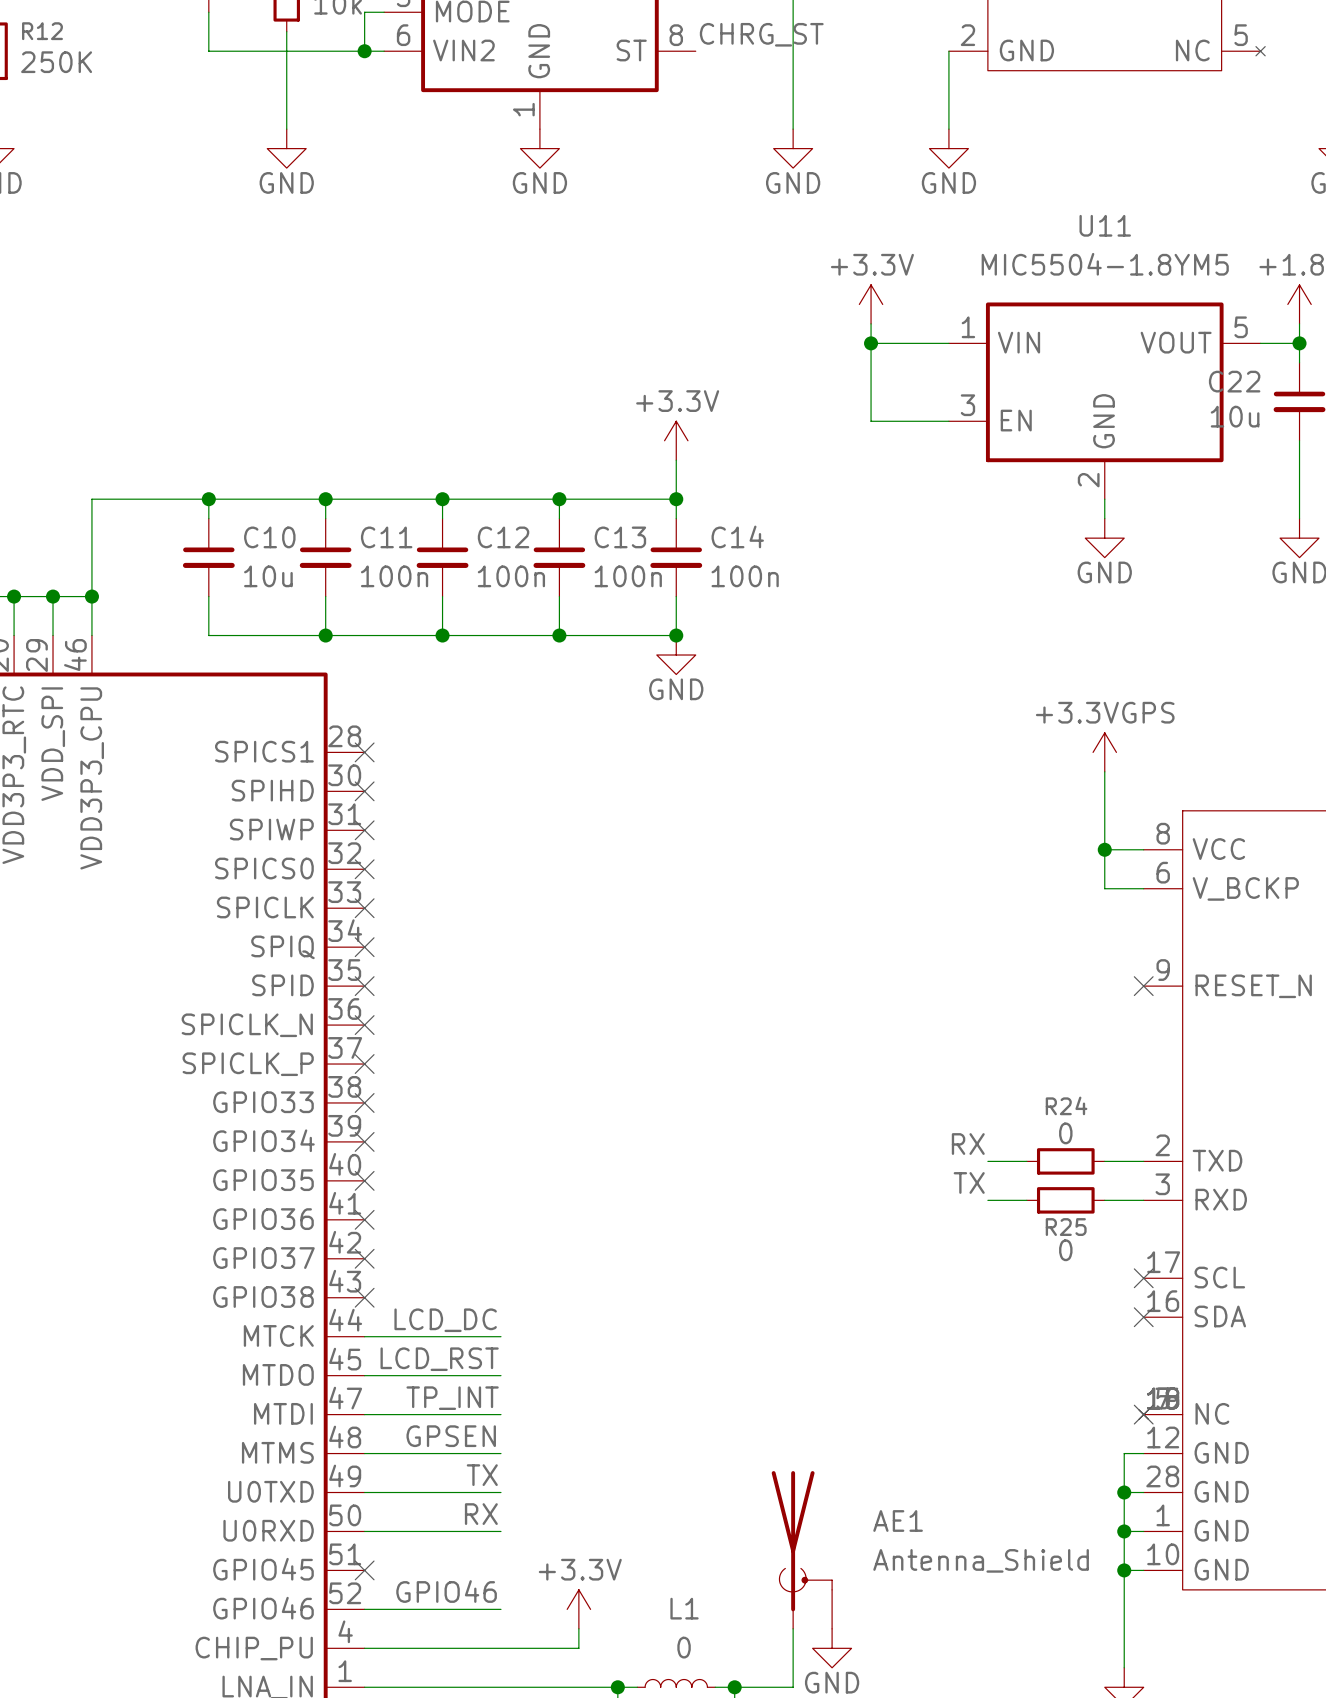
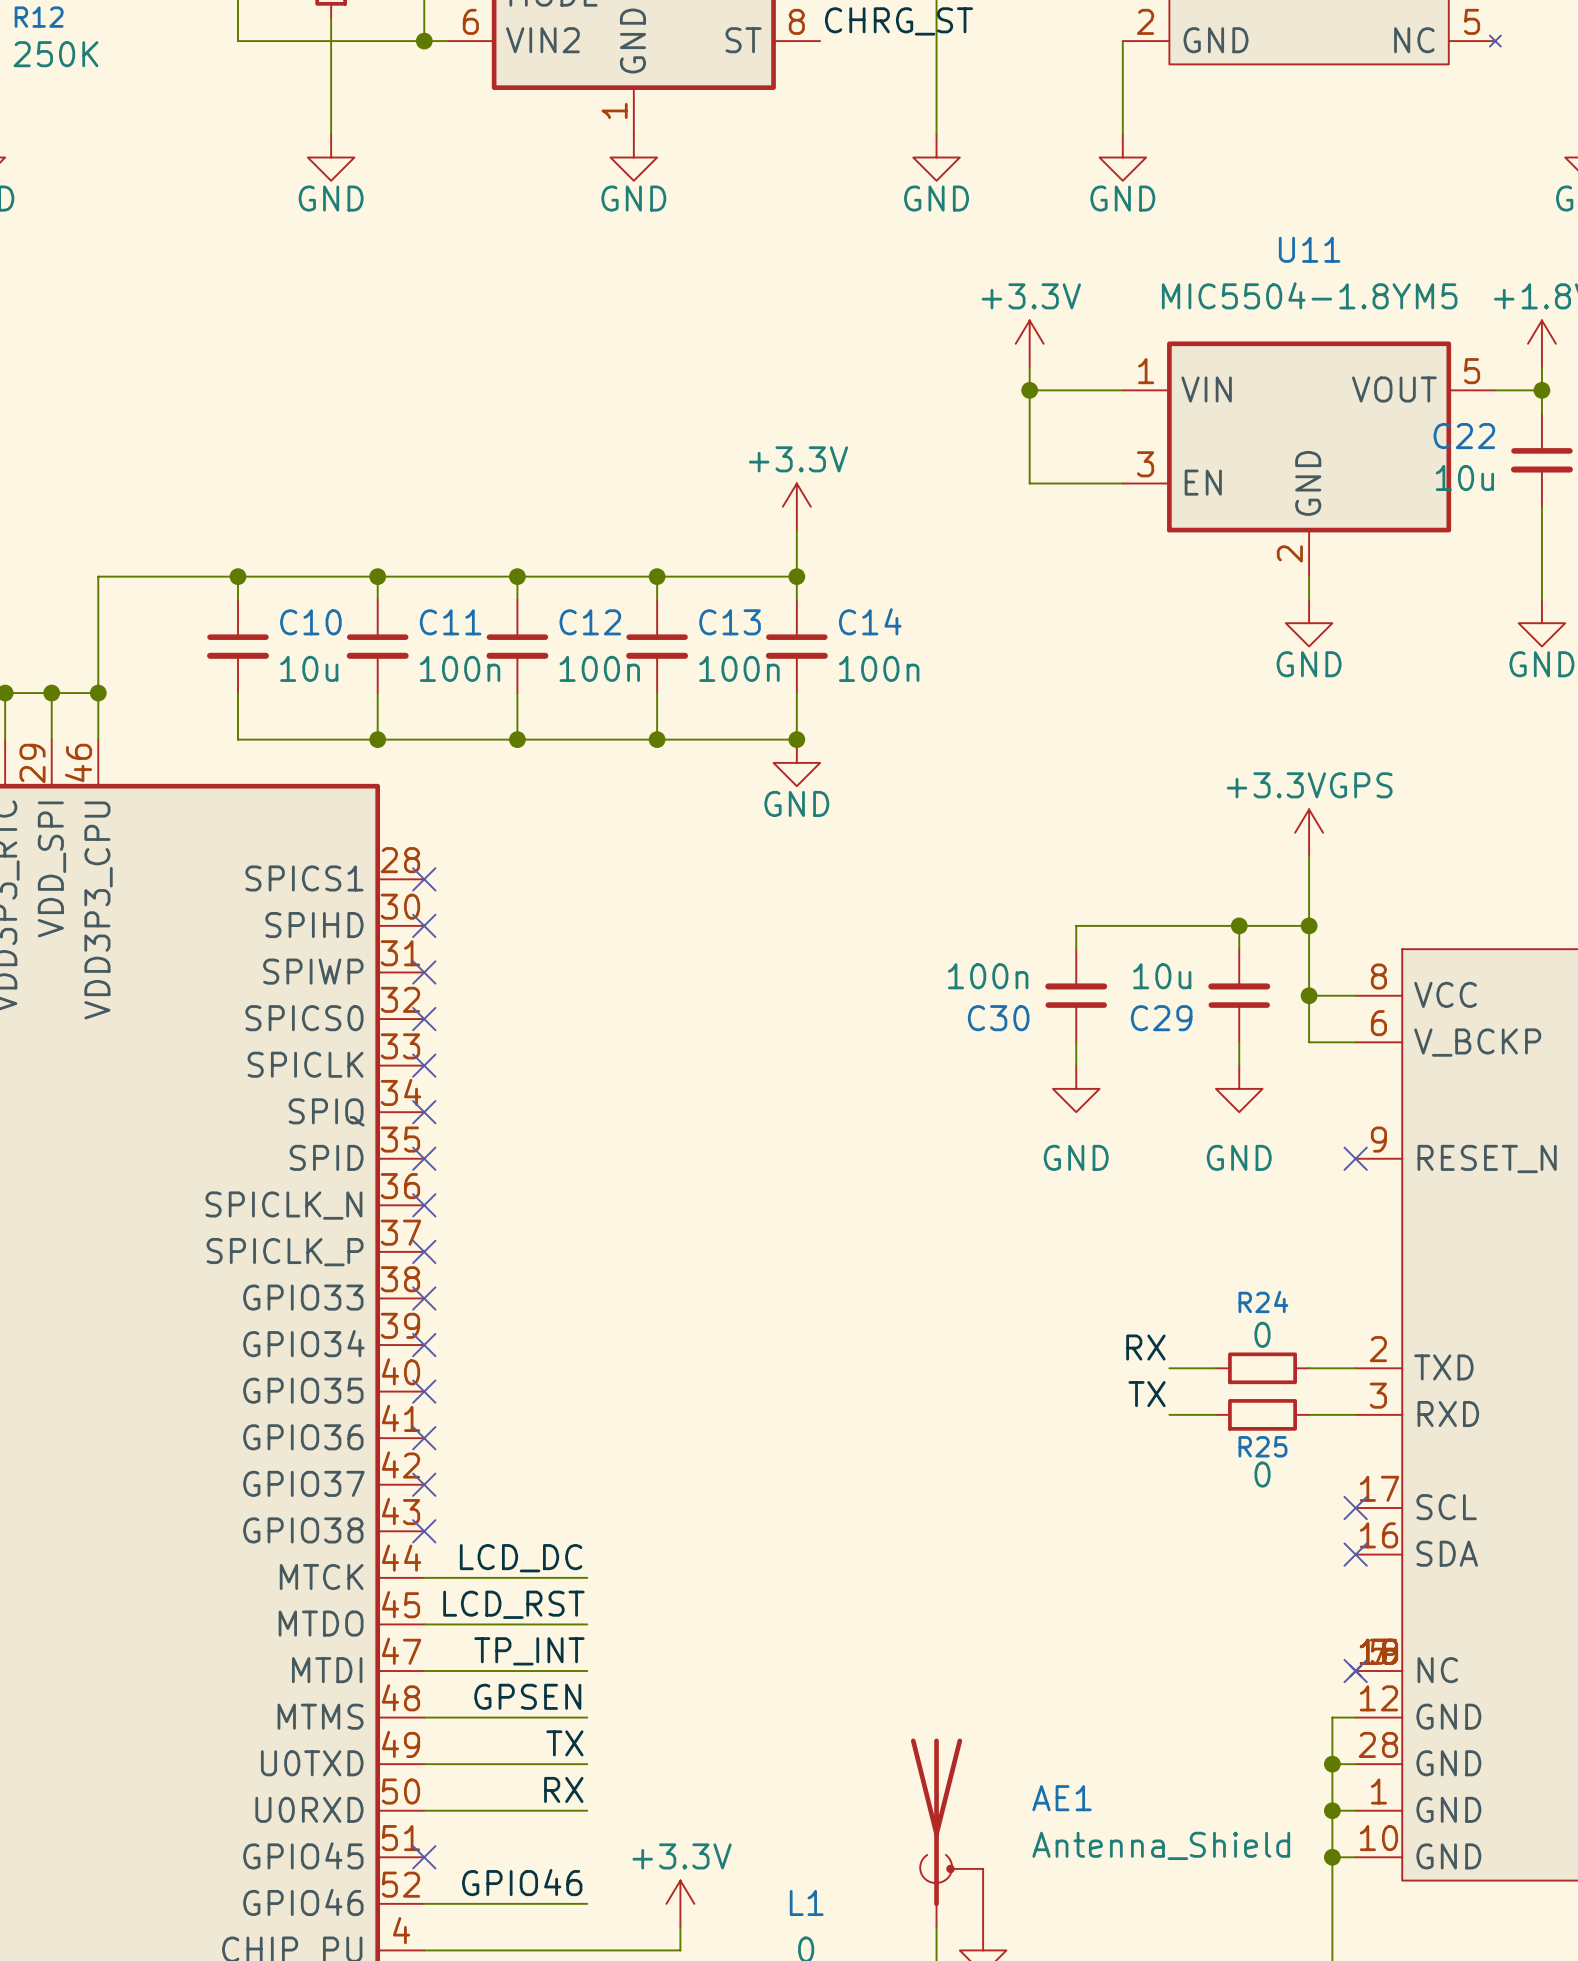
power symbol position: +3.3VGPS (1104, 752) -> +3.3VGPS (1309, 832)
wire: none -> (1239, 925) (1239, 949)
junction: none -> (1239, 925)
wire: none -> (1309, 925) (1076, 925) (1076, 949)
junction: none -> (1309, 925)
C30: none -> 100n (1076, 995)
C29: none -> 10u (1239, 995)
wire: none -> (1076, 1042) (1076, 1065)
wire: none -> (1239, 1042) (1239, 1065)
power symbol: none -> GND (1076, 1088)
power symbol: none -> GND (1239, 1088)

